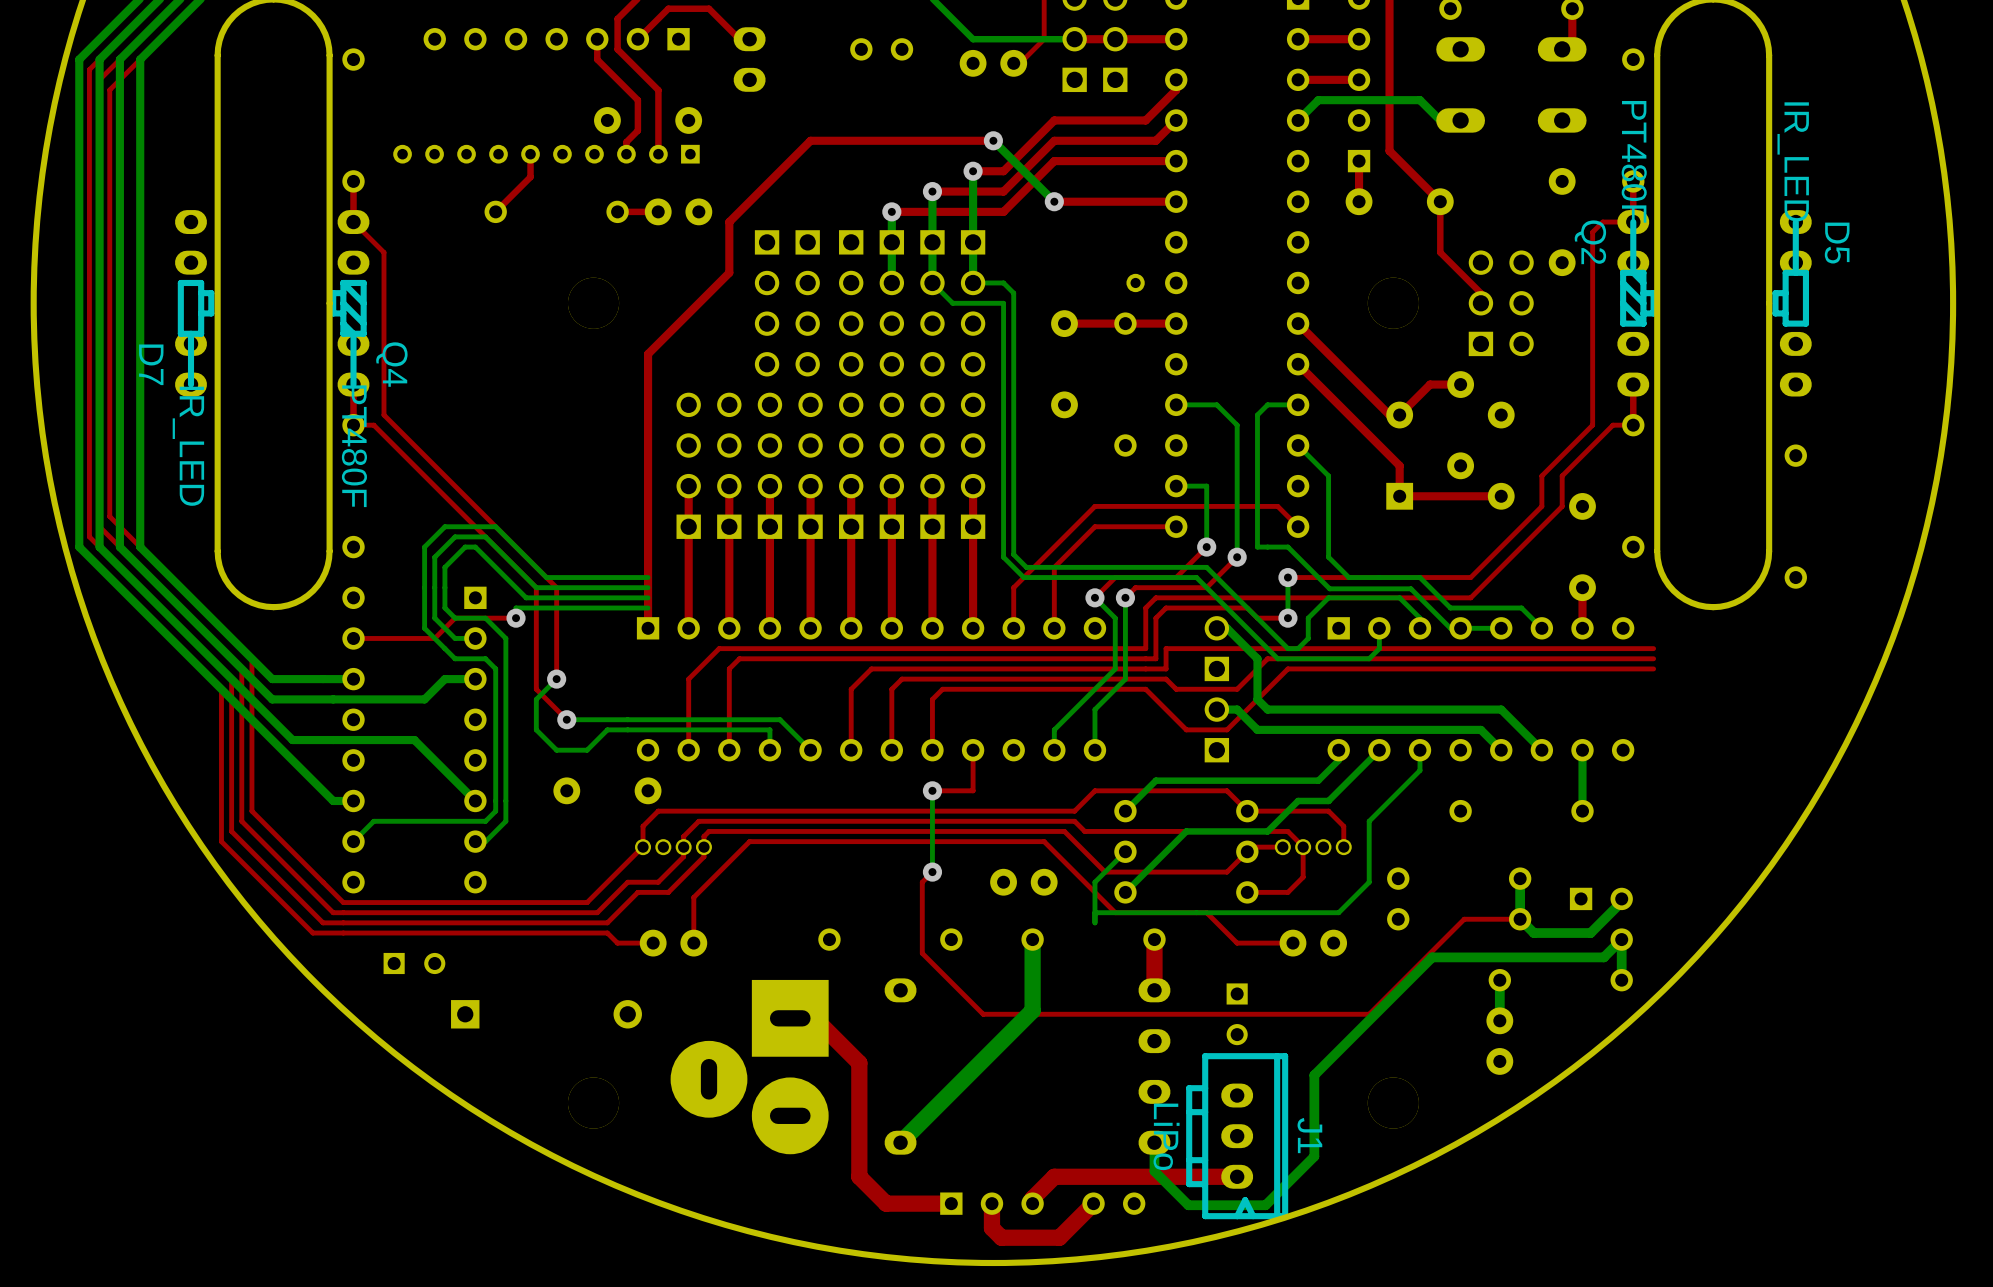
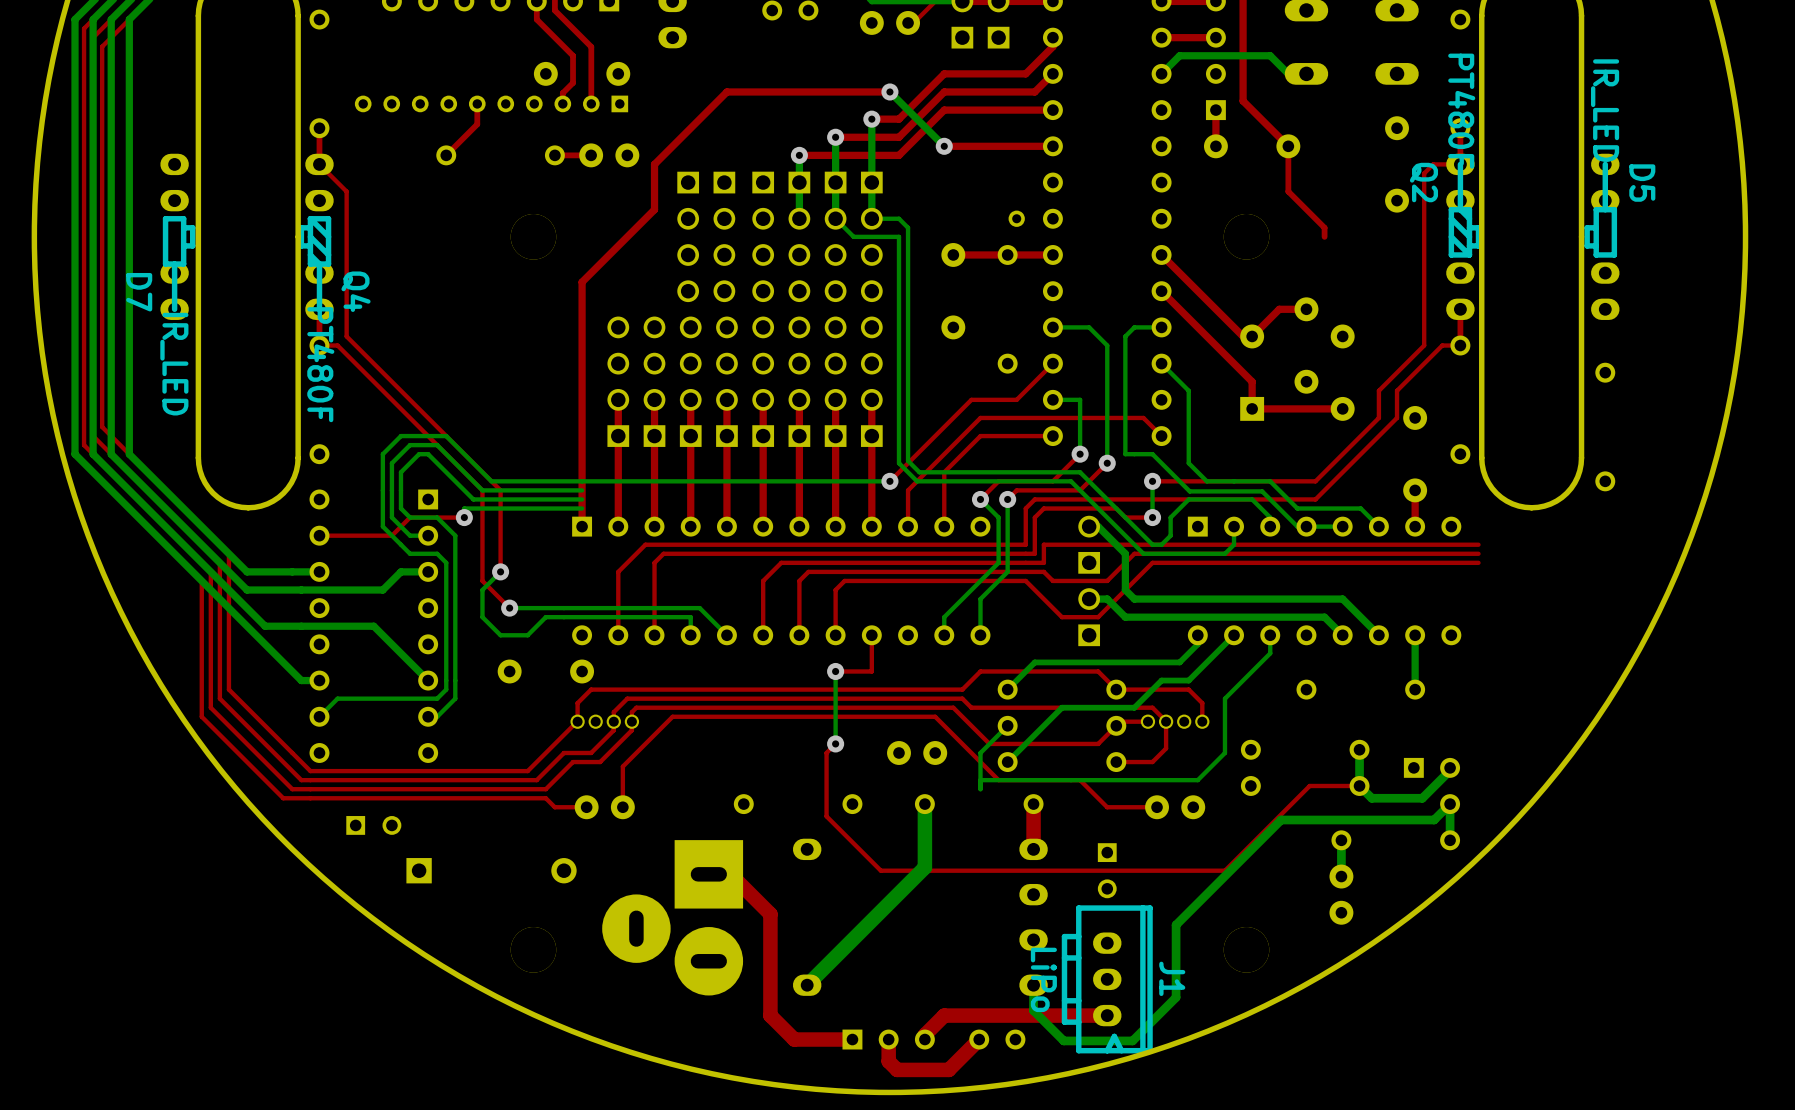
part: (1501, 303) -> none
top track: none -> (1052, 363) (1016, 399) (971, 399) (889, 481)
bottom track: none -> (889, 481) (582, 481)
via: none -> (889, 481)

